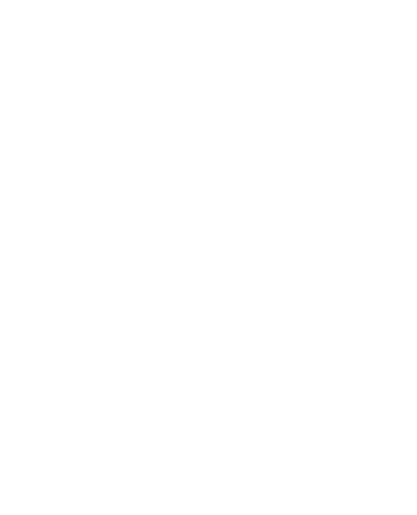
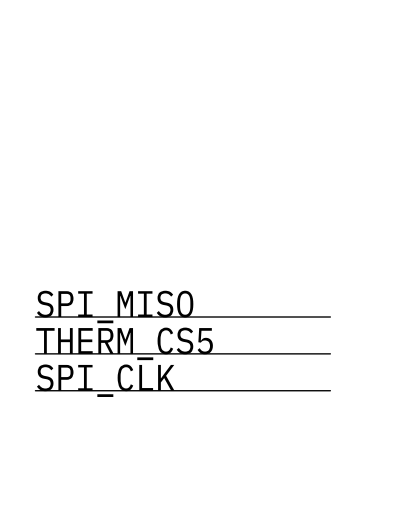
label: none -> SPI_MISO (115, 307)
wire: none -> (35, 317) (330, 317)
label: none -> THERM_CS5 (124, 343)
wire: none -> (35, 353) (330, 353)
label: none -> SPI_CLK (105, 380)
wire: none -> (35, 390) (330, 390)

